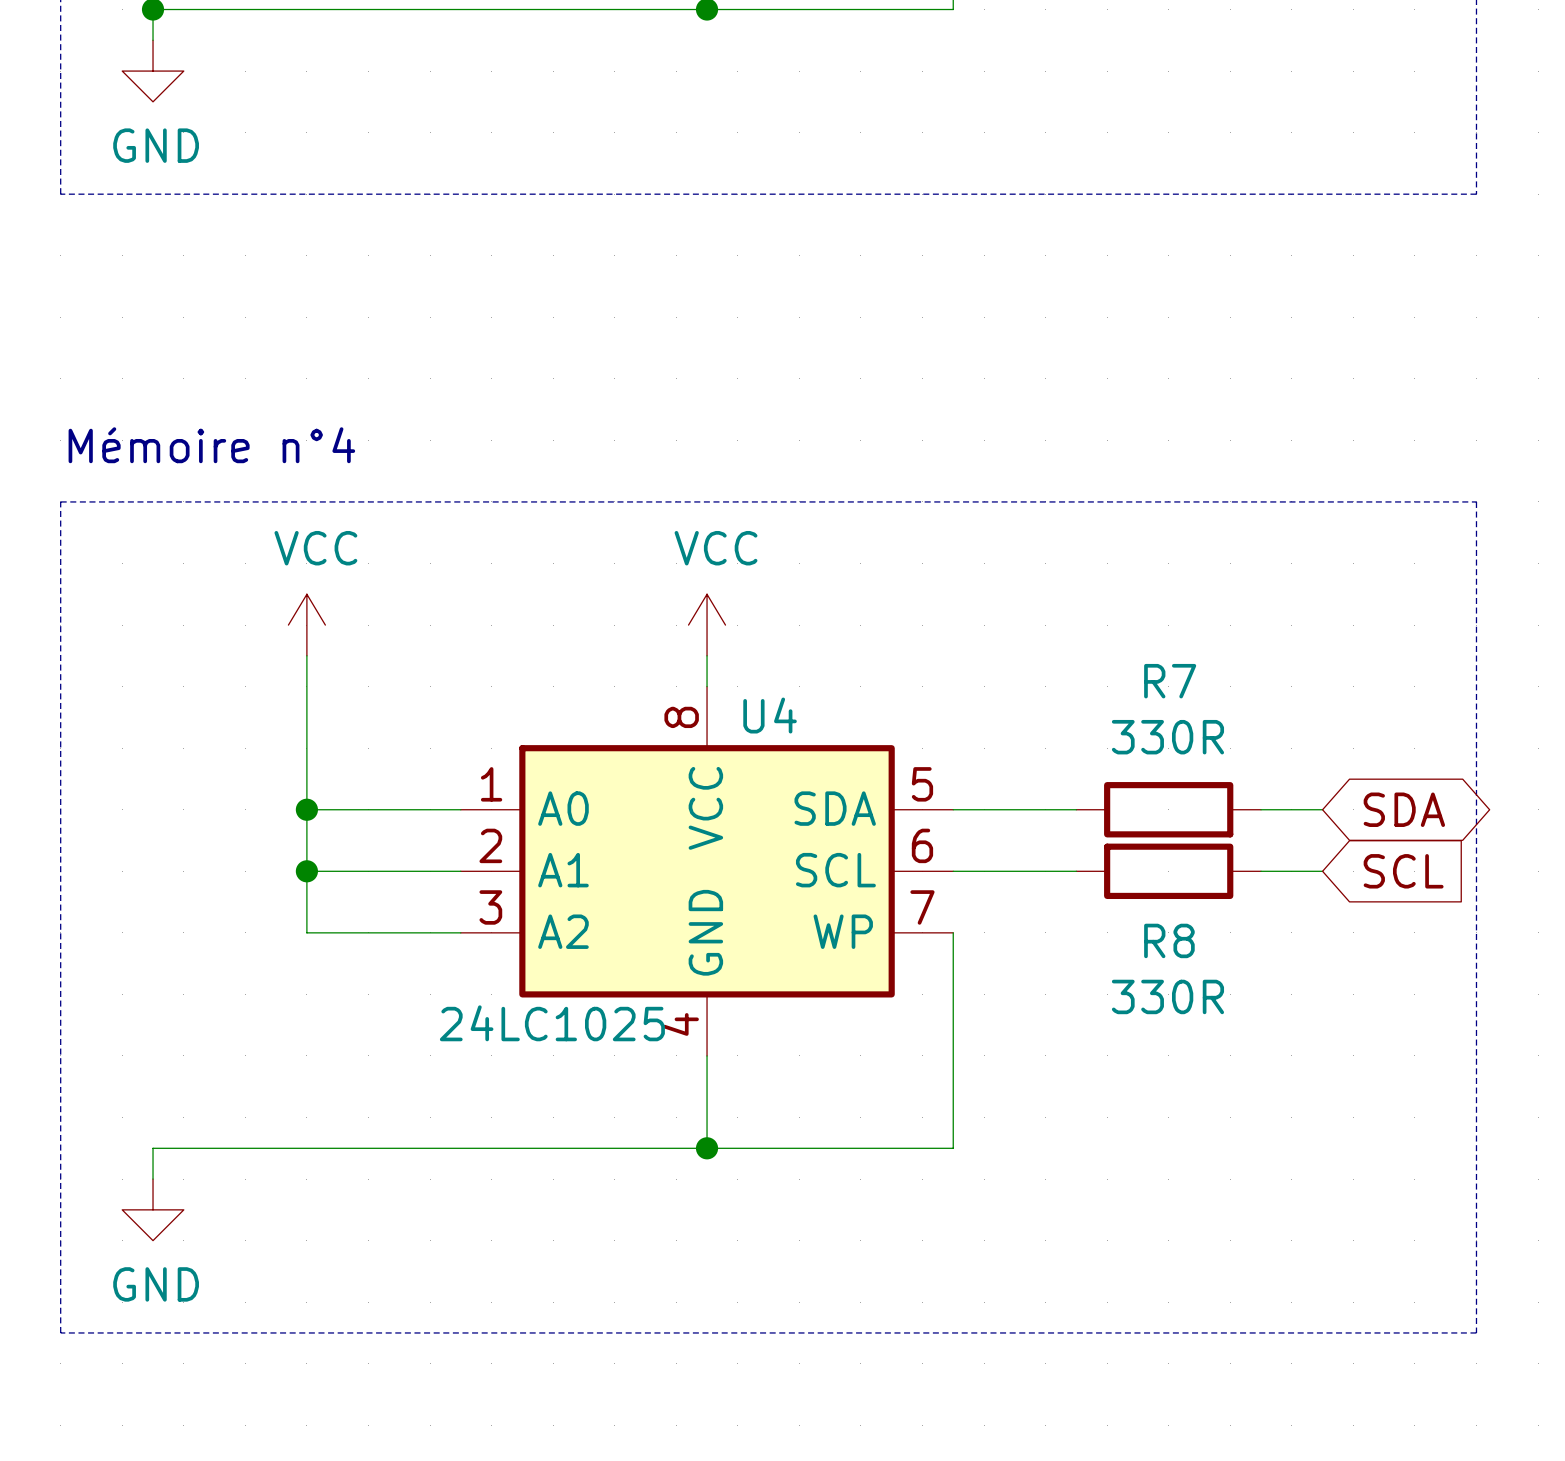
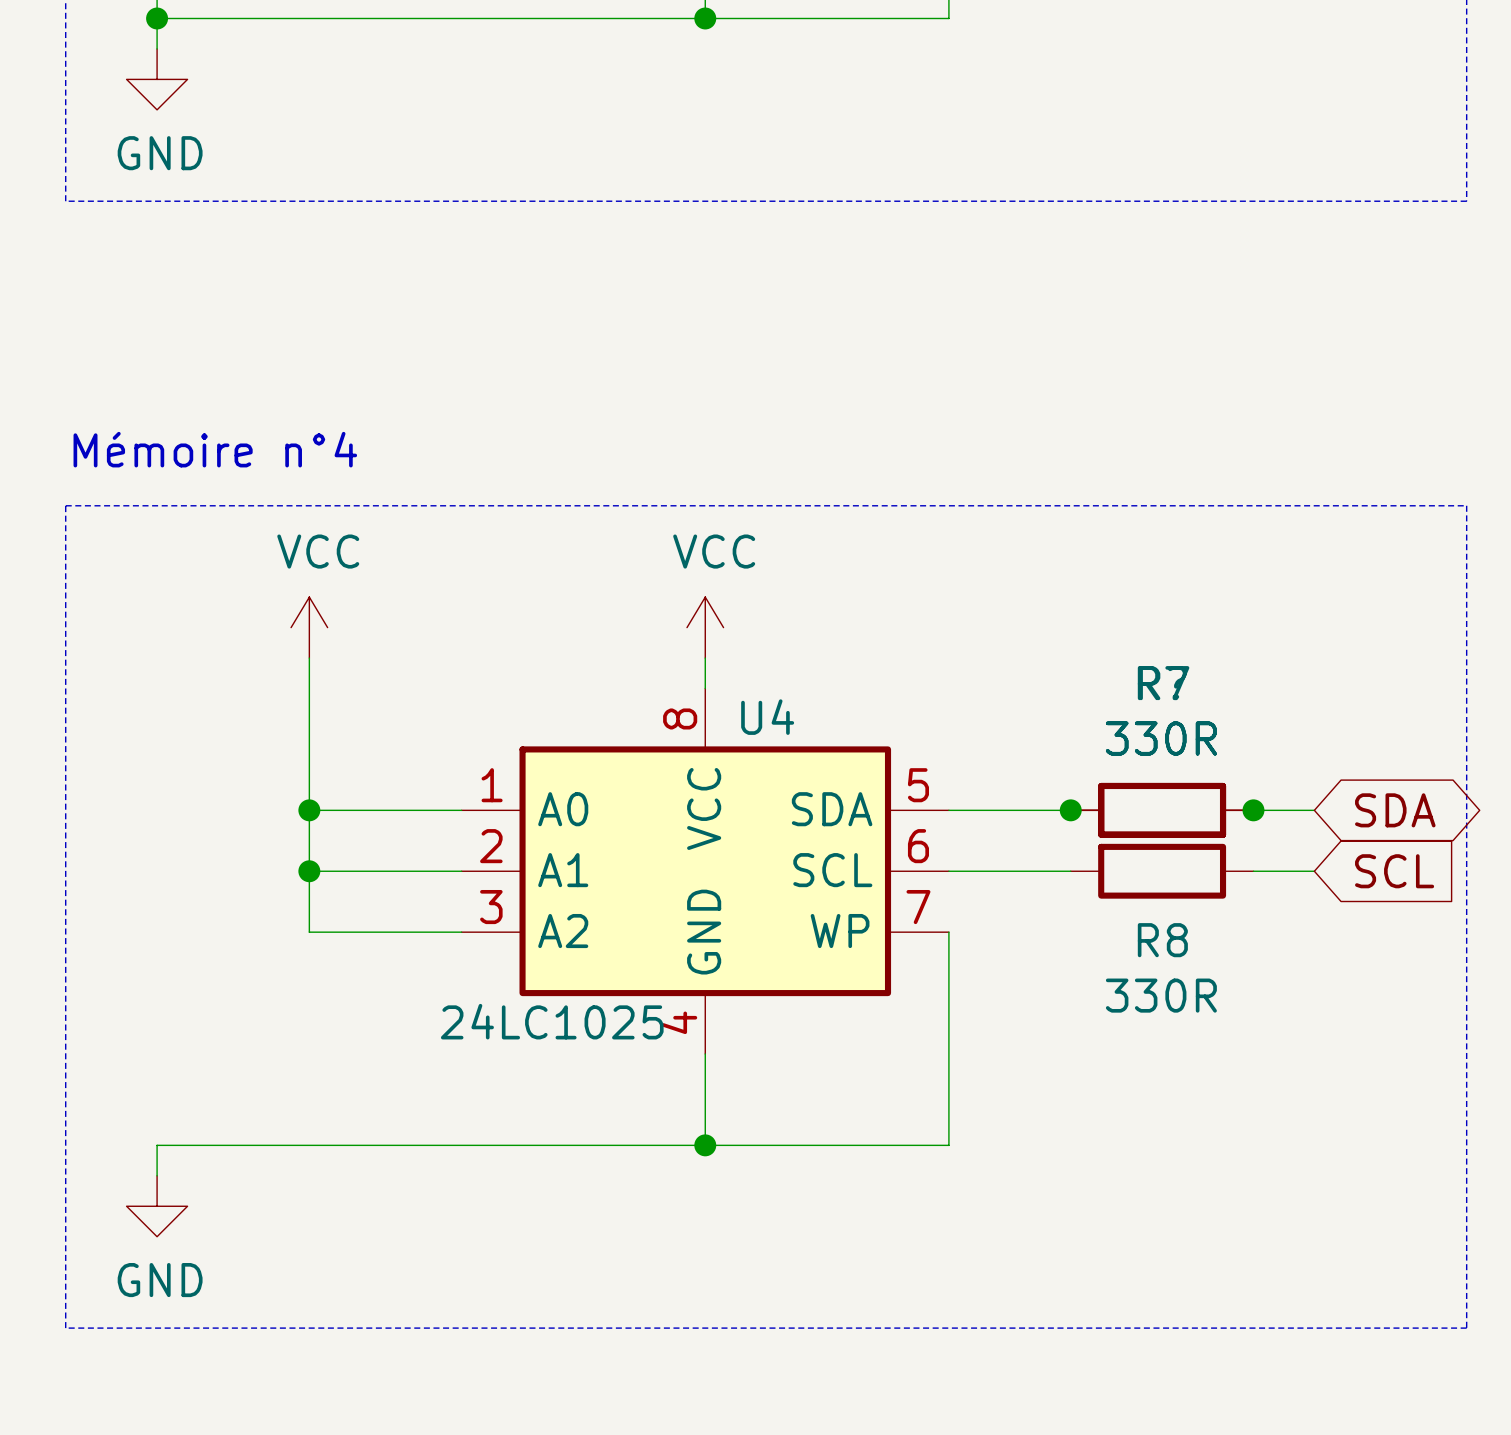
junction: none -> (1070, 810)
part: none -> 330R (1162, 810)
junction: none -> (1253, 810)

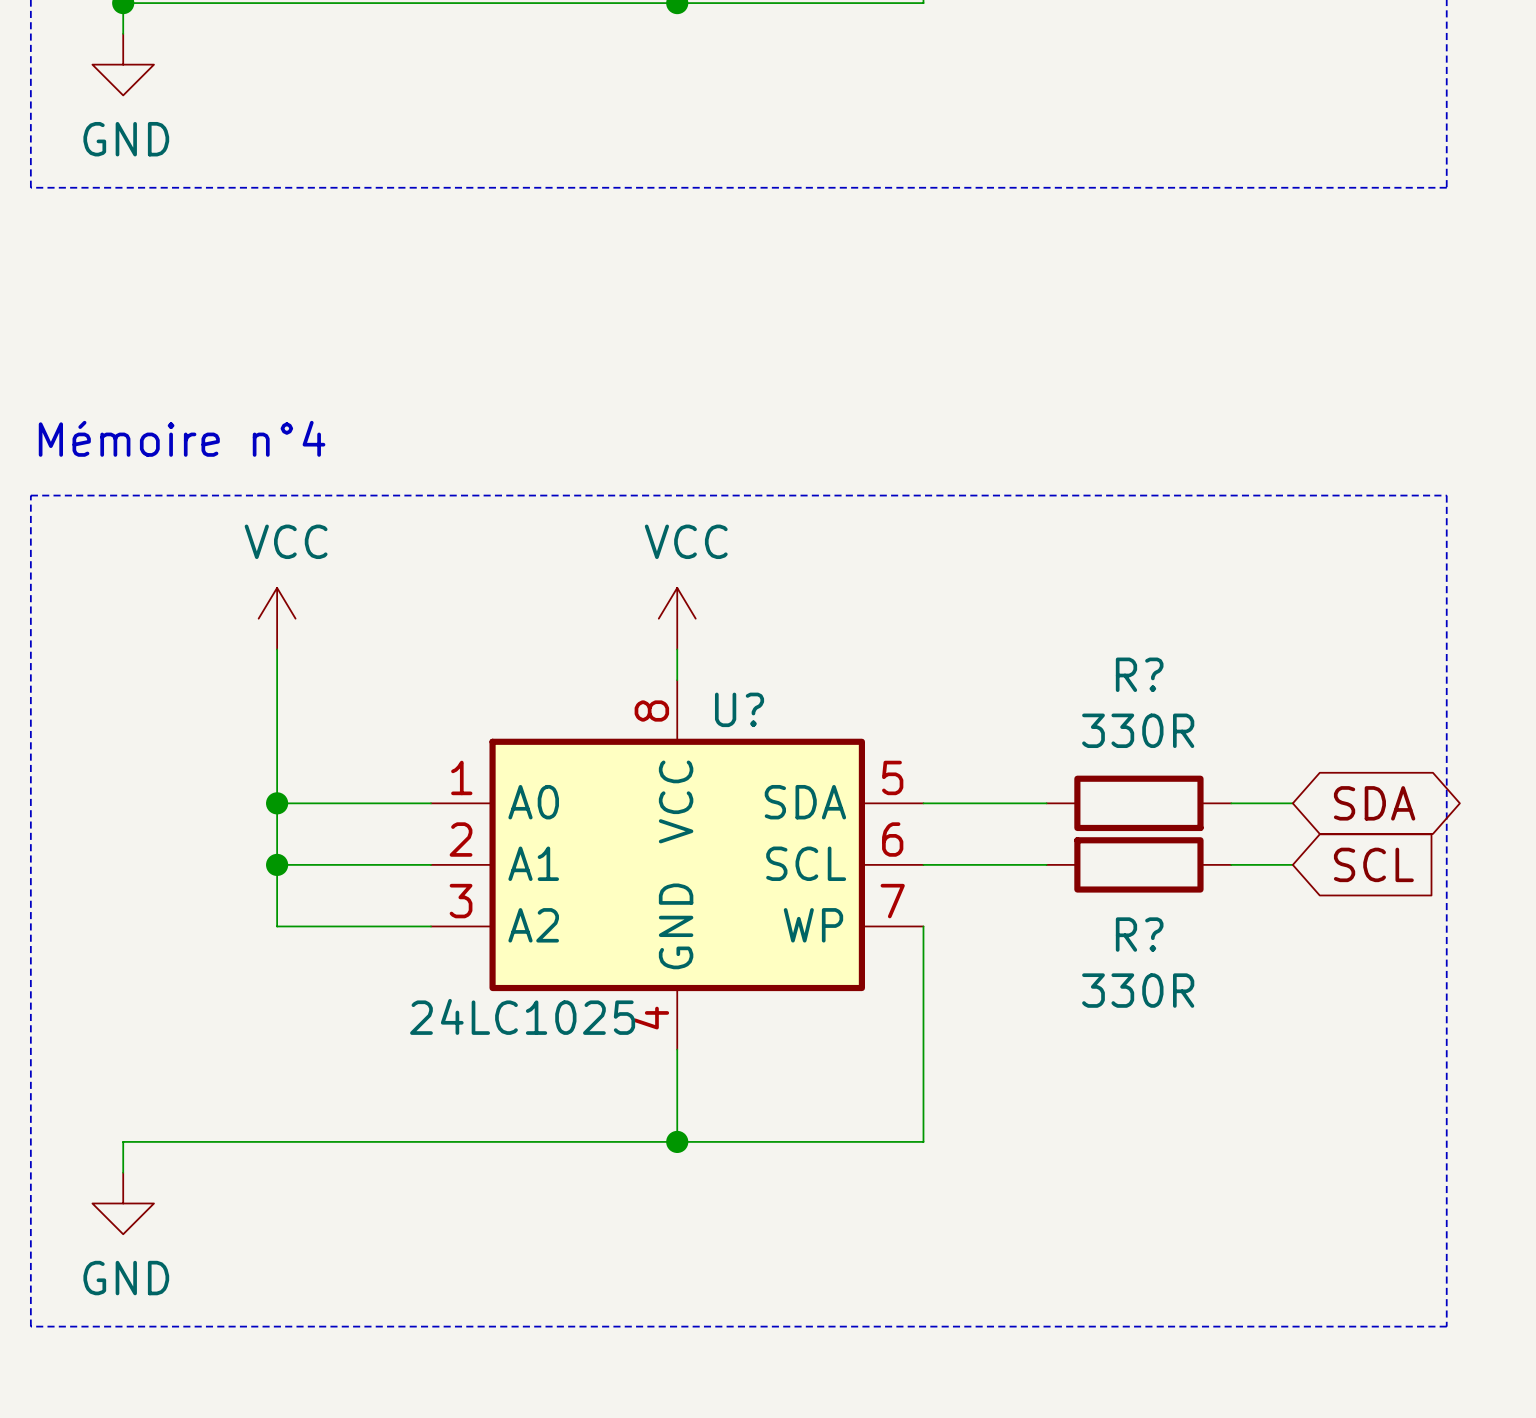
U4 name: U4 (767, 717) -> U? (739, 709)
junction: (1070, 810) -> none
part: 330R (1162, 810) -> none
junction: (1253, 810) -> none
R8 name: R8 (1162, 940) -> R? (1139, 934)

